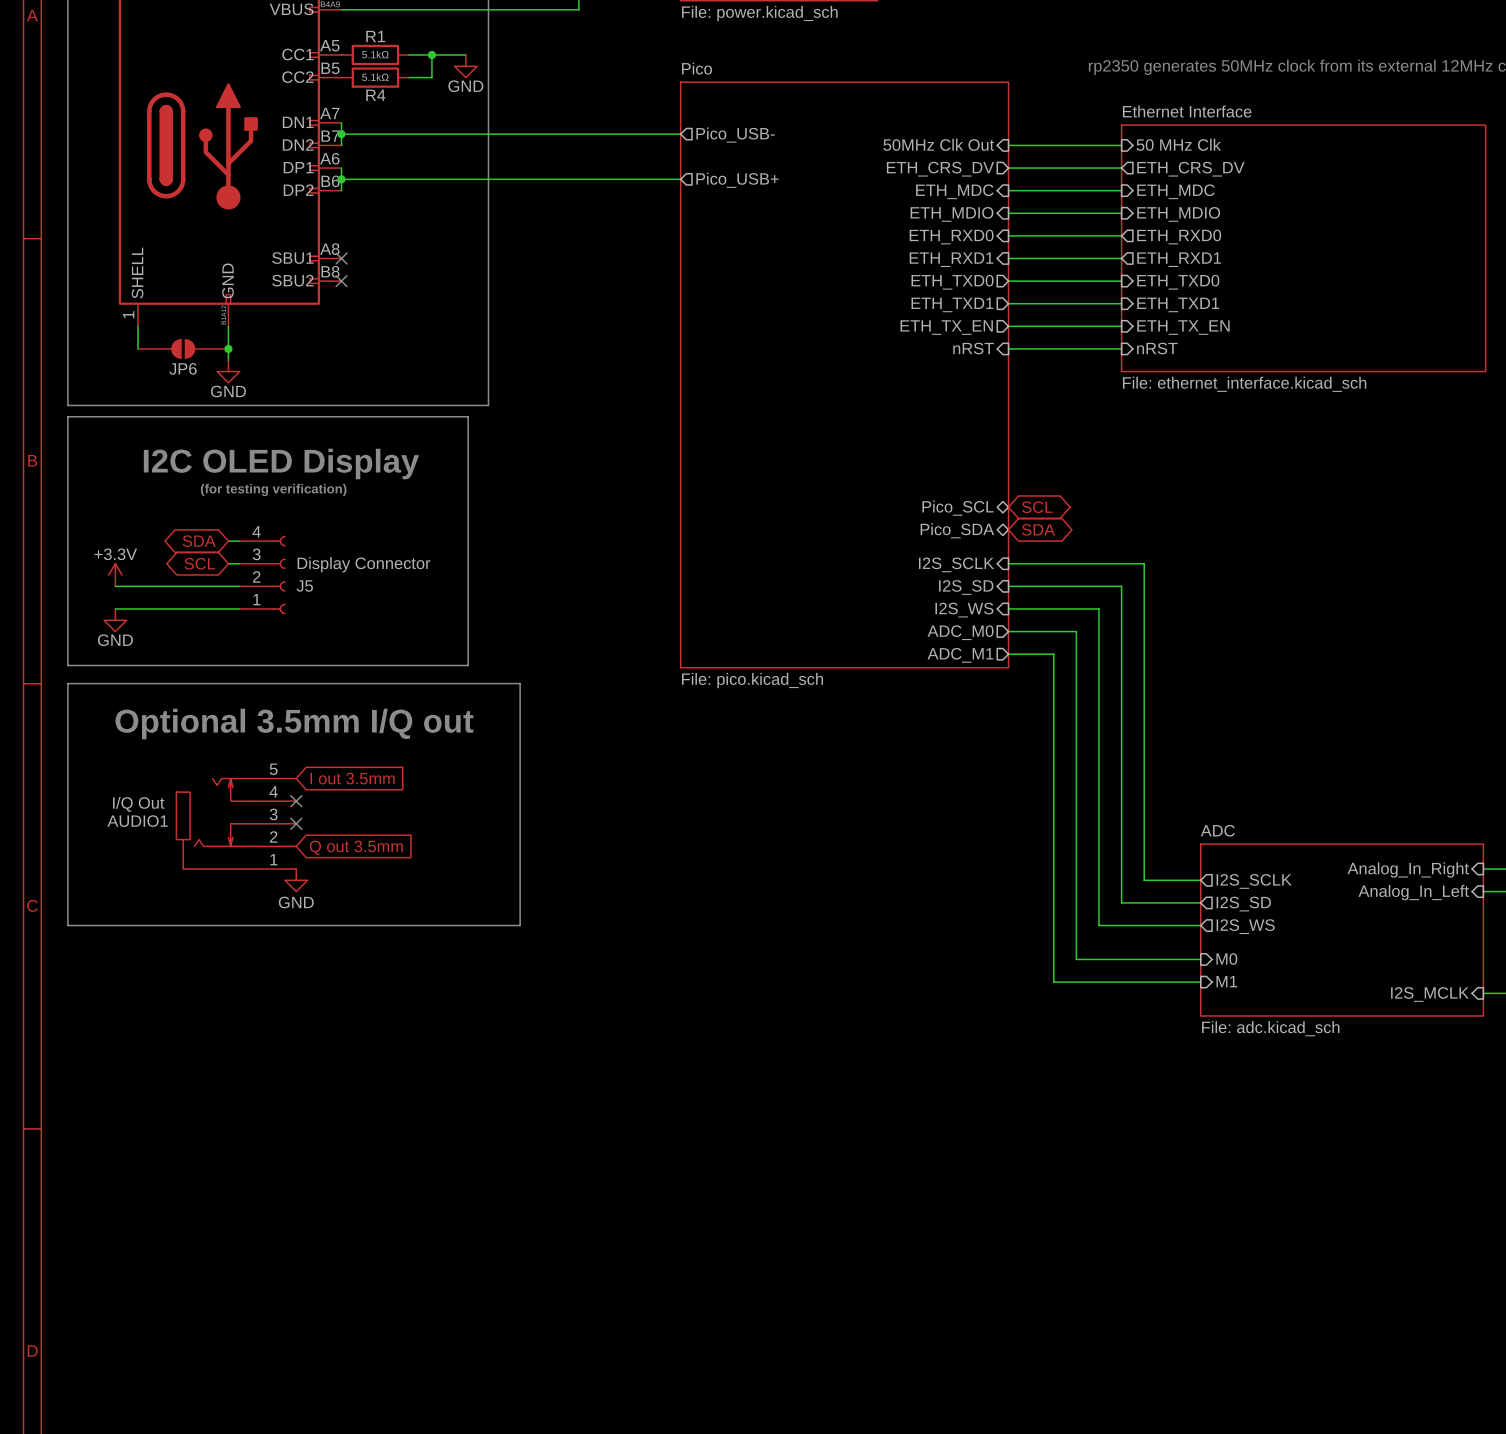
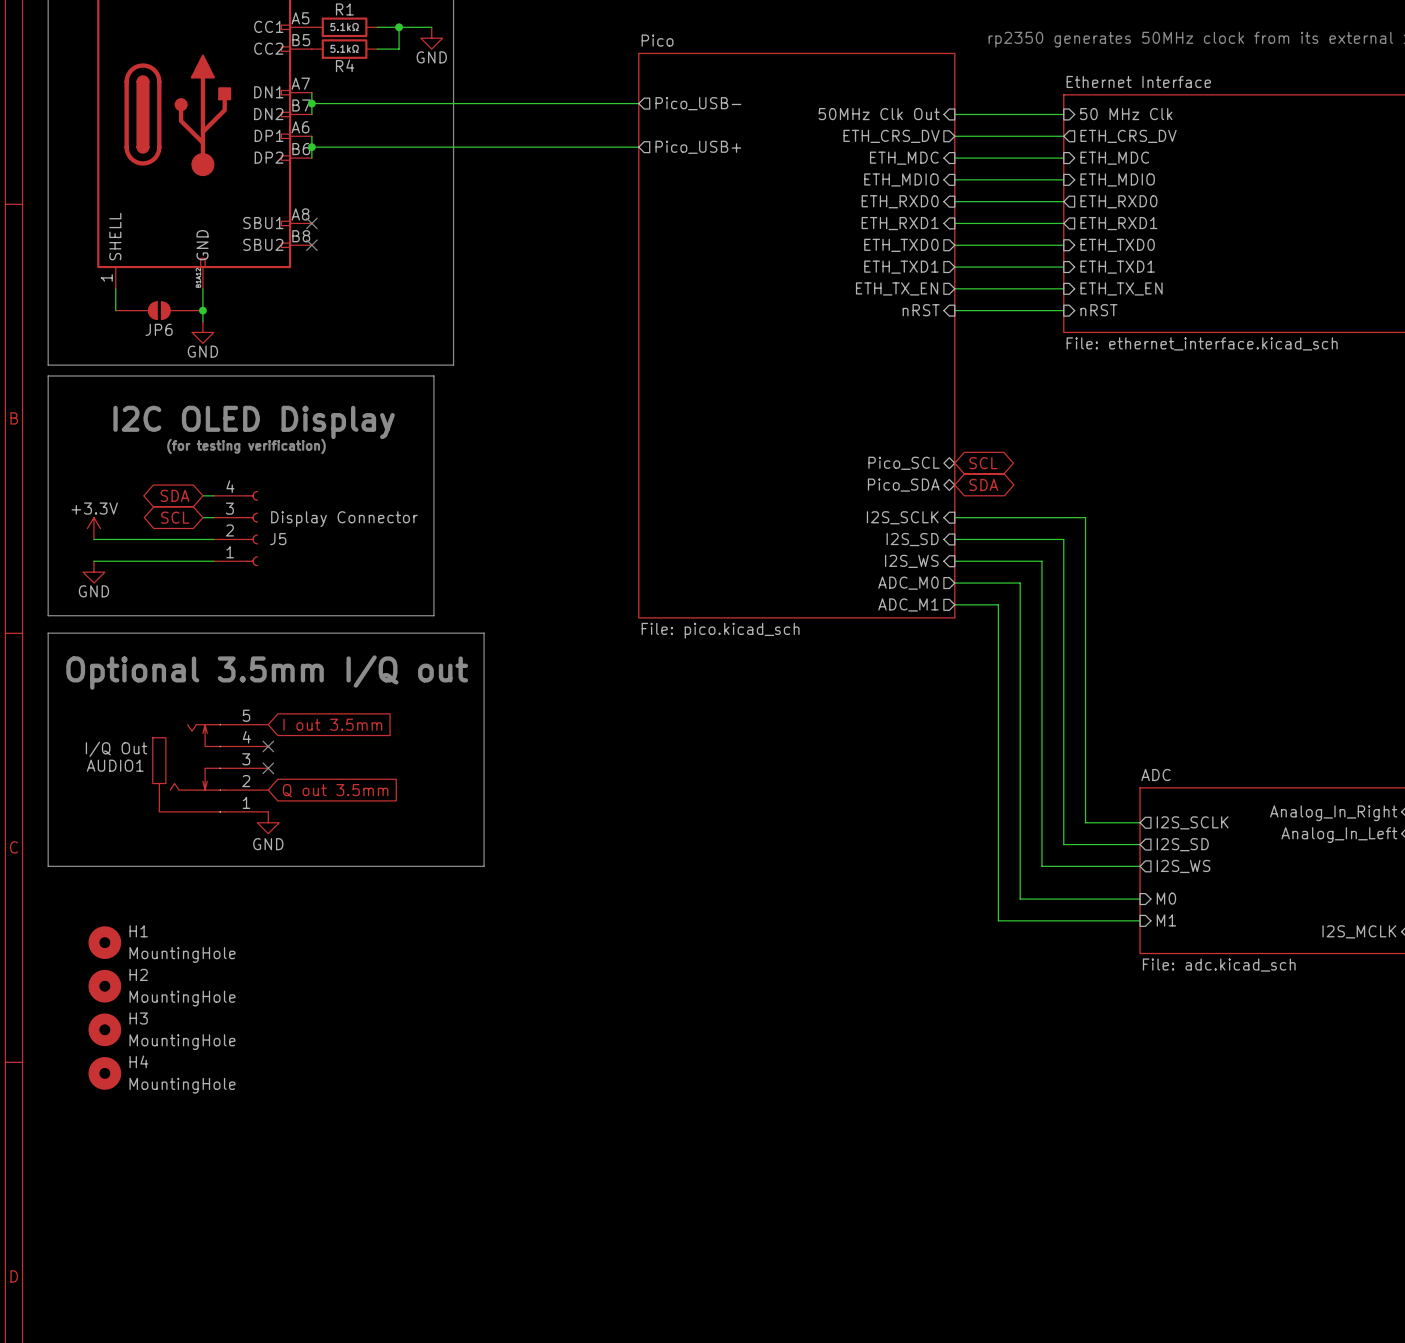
H1: none -> MountingHole (104, 942)
H2: none -> MountingHole (104, 986)
H3: none -> MountingHole (104, 1029)
H4: none -> MountingHole (104, 1073)

